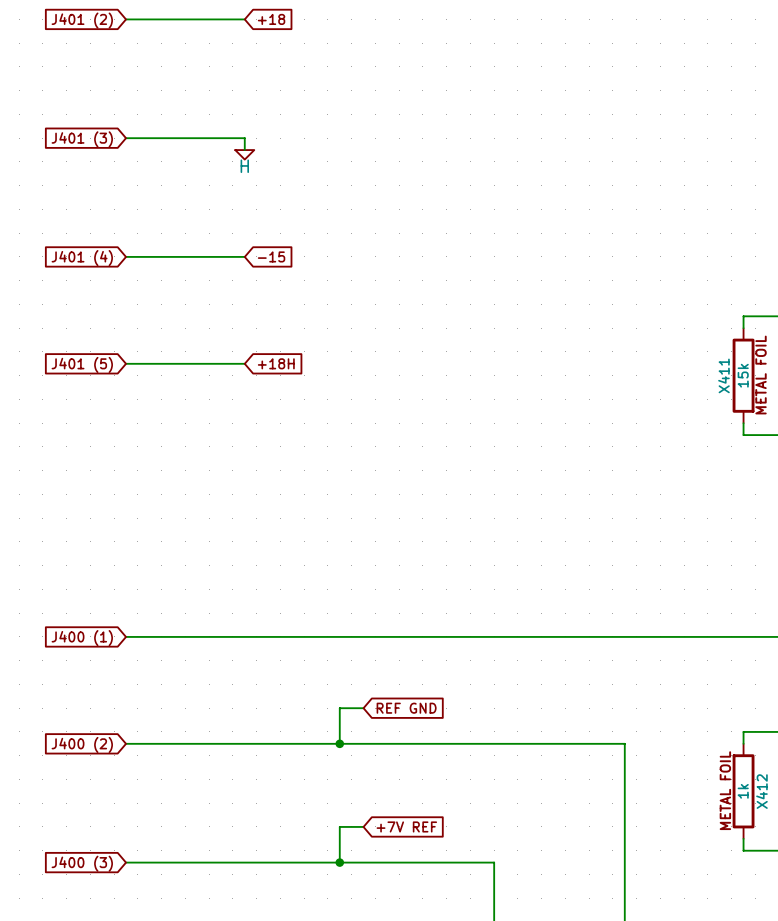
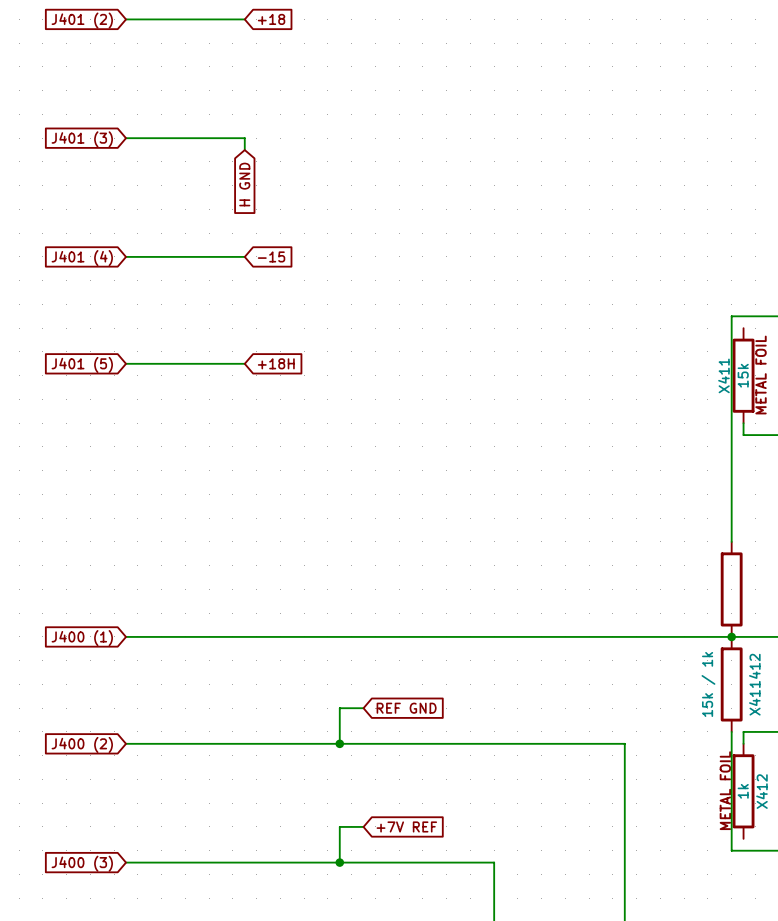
power symbol: H (244, 154) -> none
global label: none -> H GND (244, 184)
wire: (743, 316) (743, 328) -> (743, 316) (731, 316) (731, 541)
X411412: none -> 15k / 1k (731, 636)
junction: none -> (731, 636)
wire: (743, 838) (743, 850) -> (731, 731) (731, 850) (743, 850)

